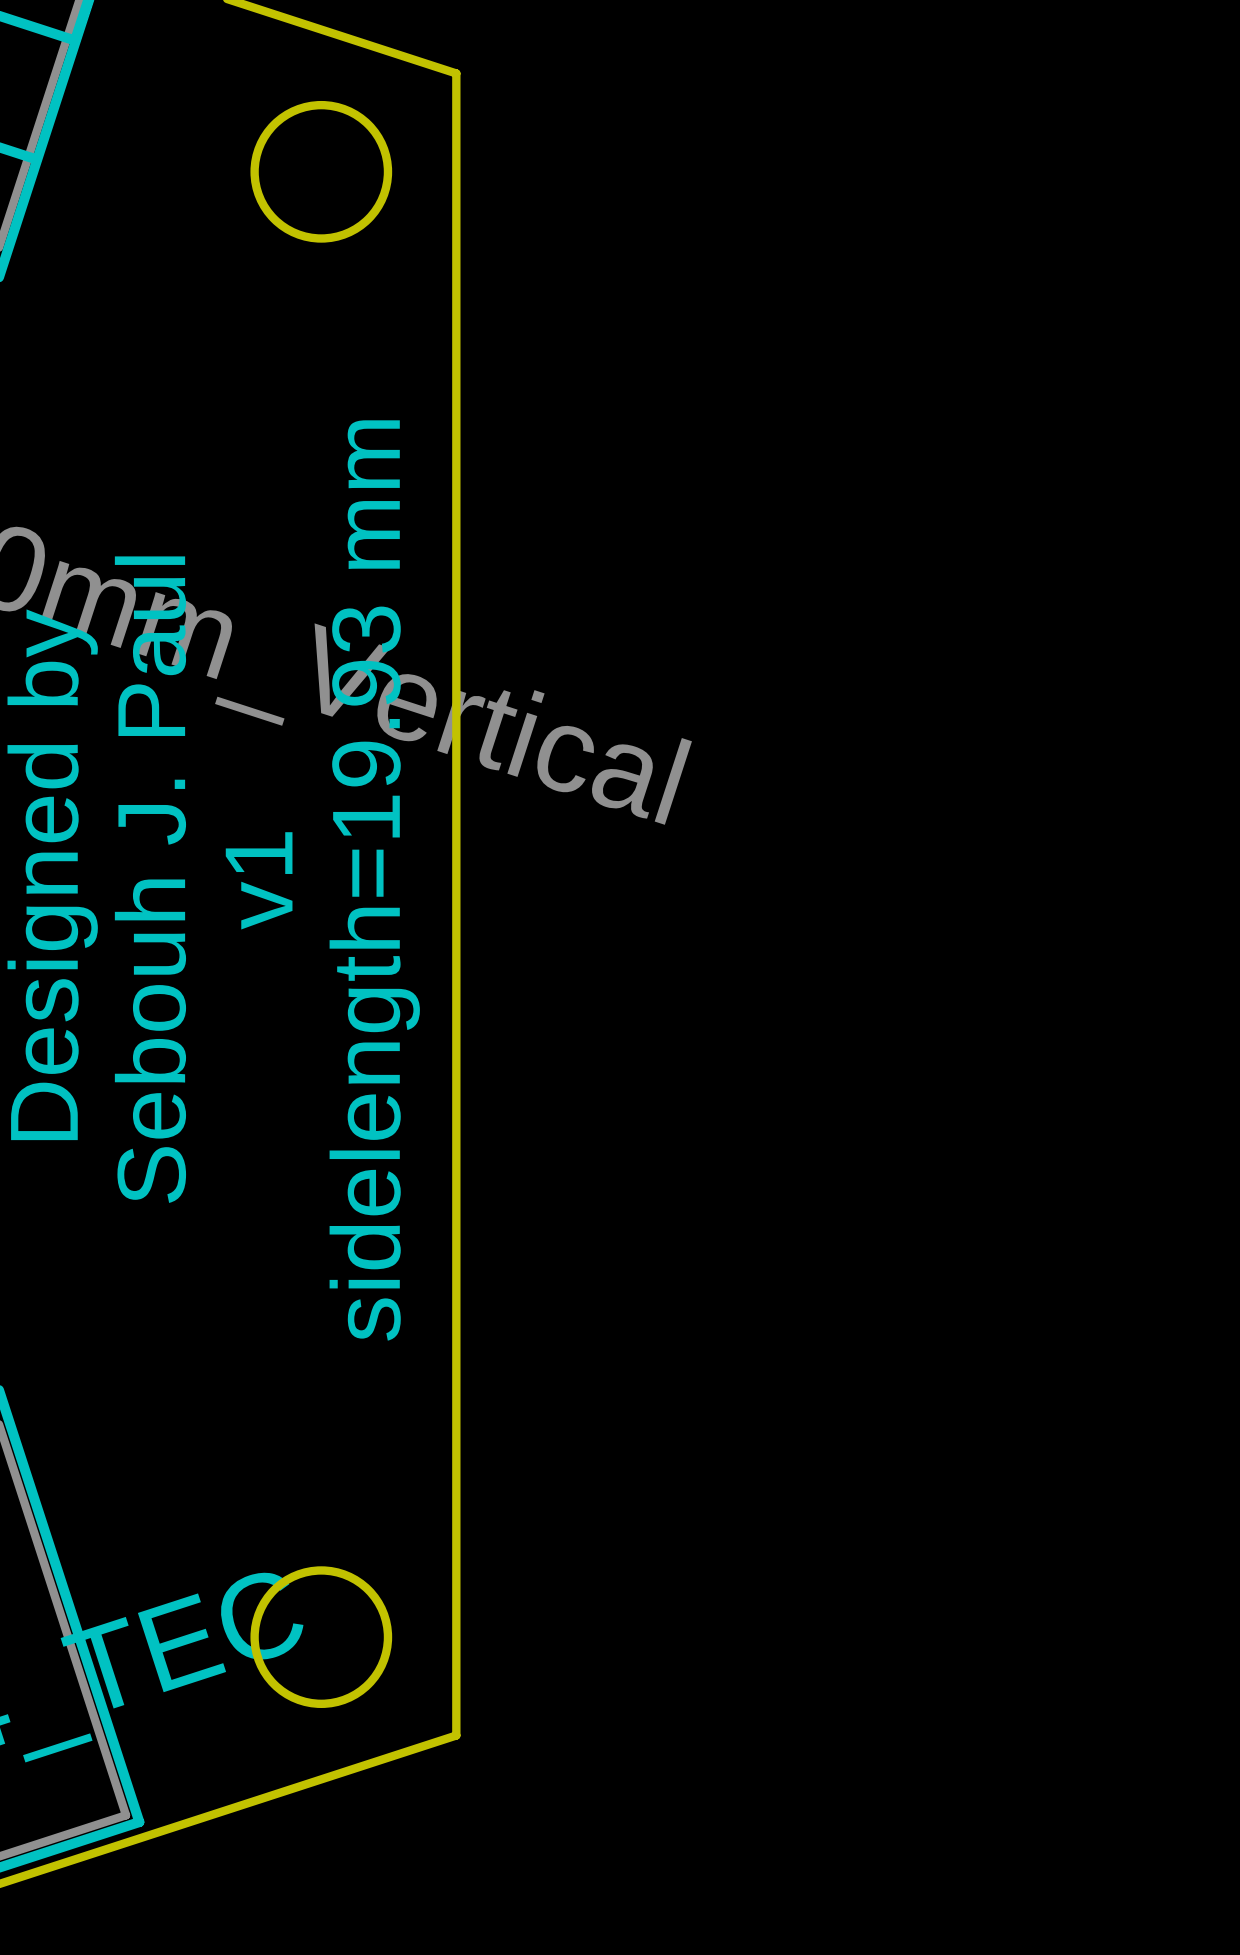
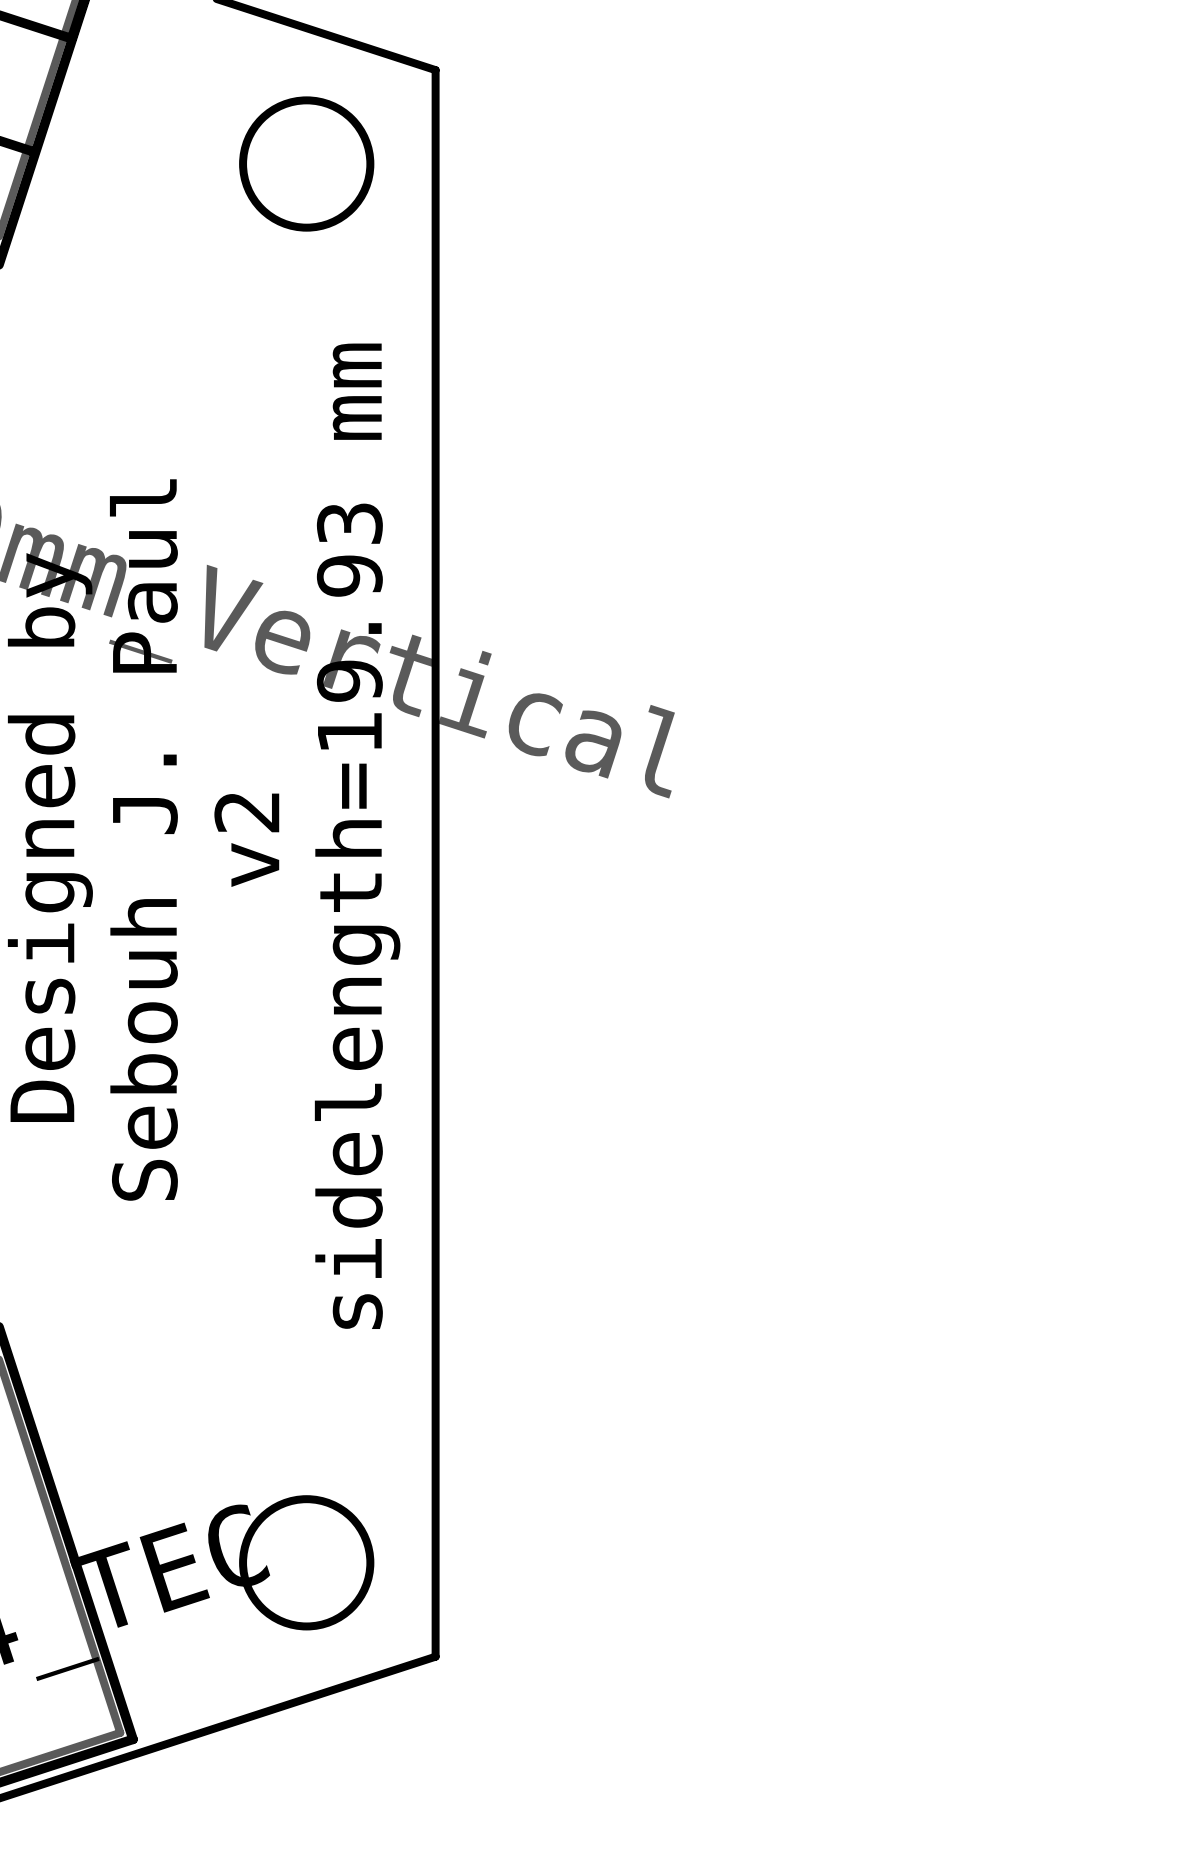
text: v1 (259, 880) -> v2 (246, 840)

